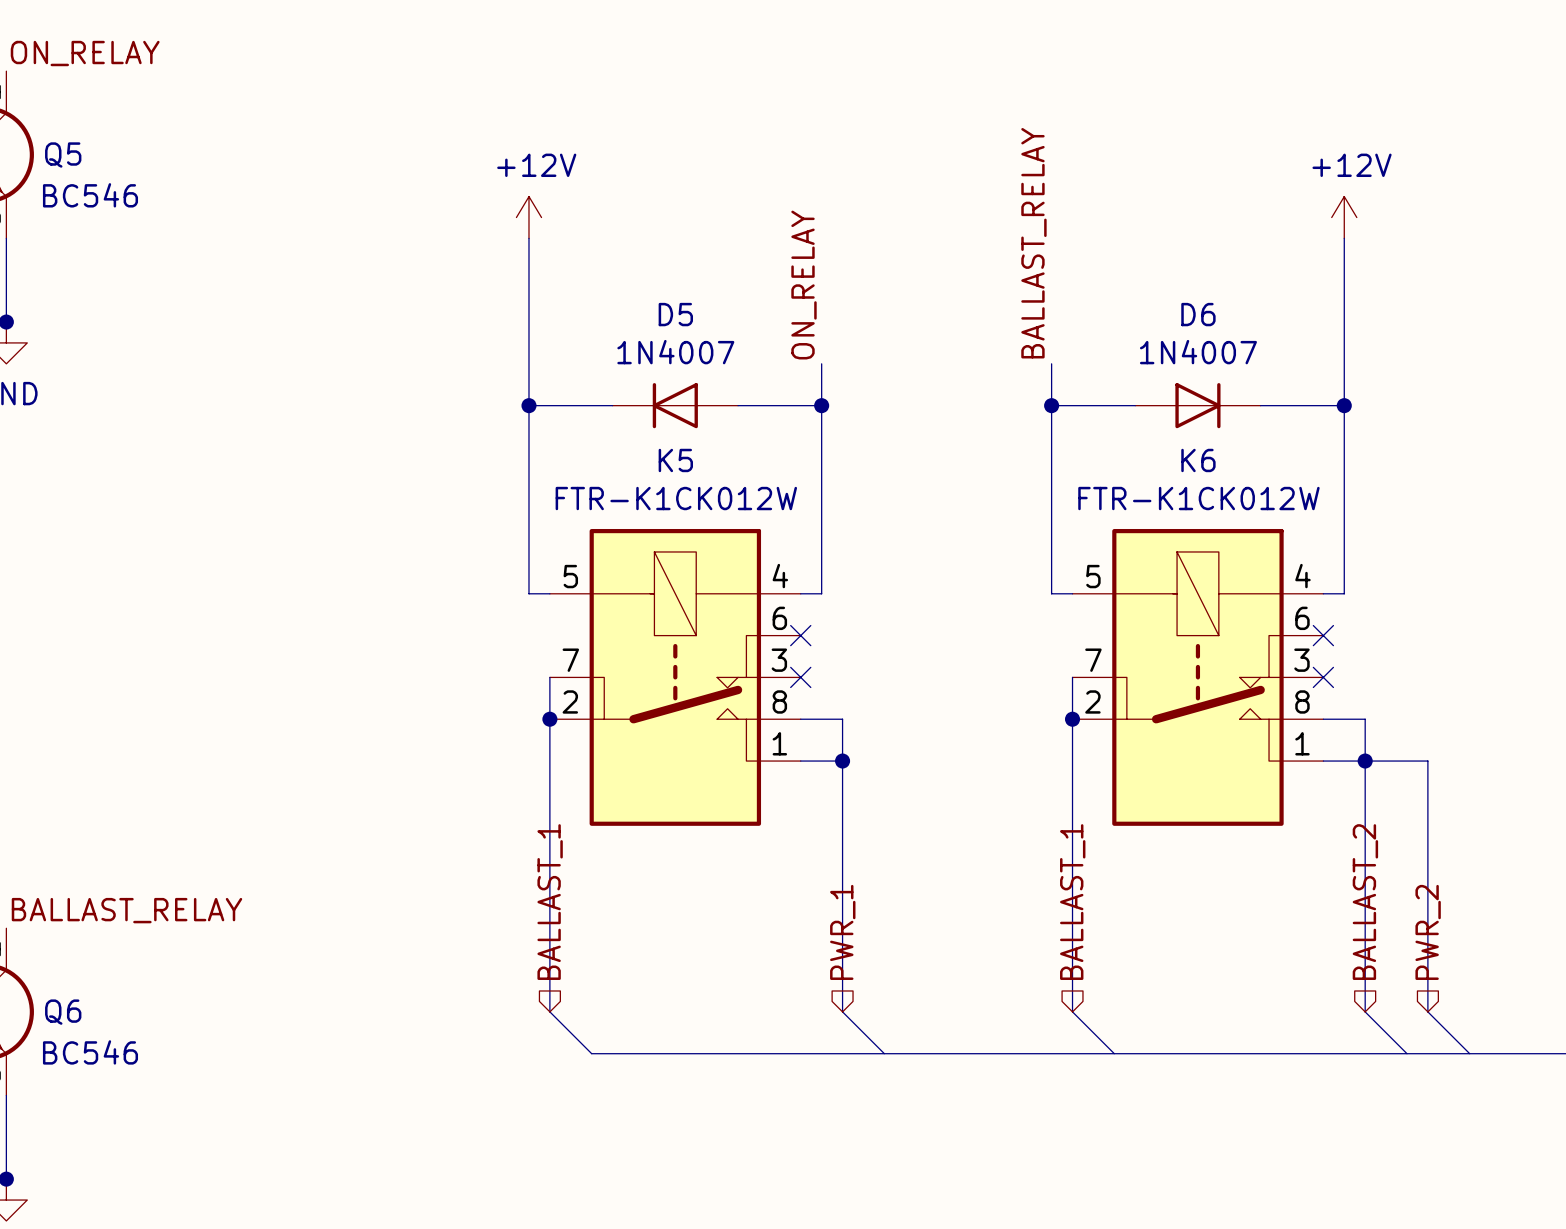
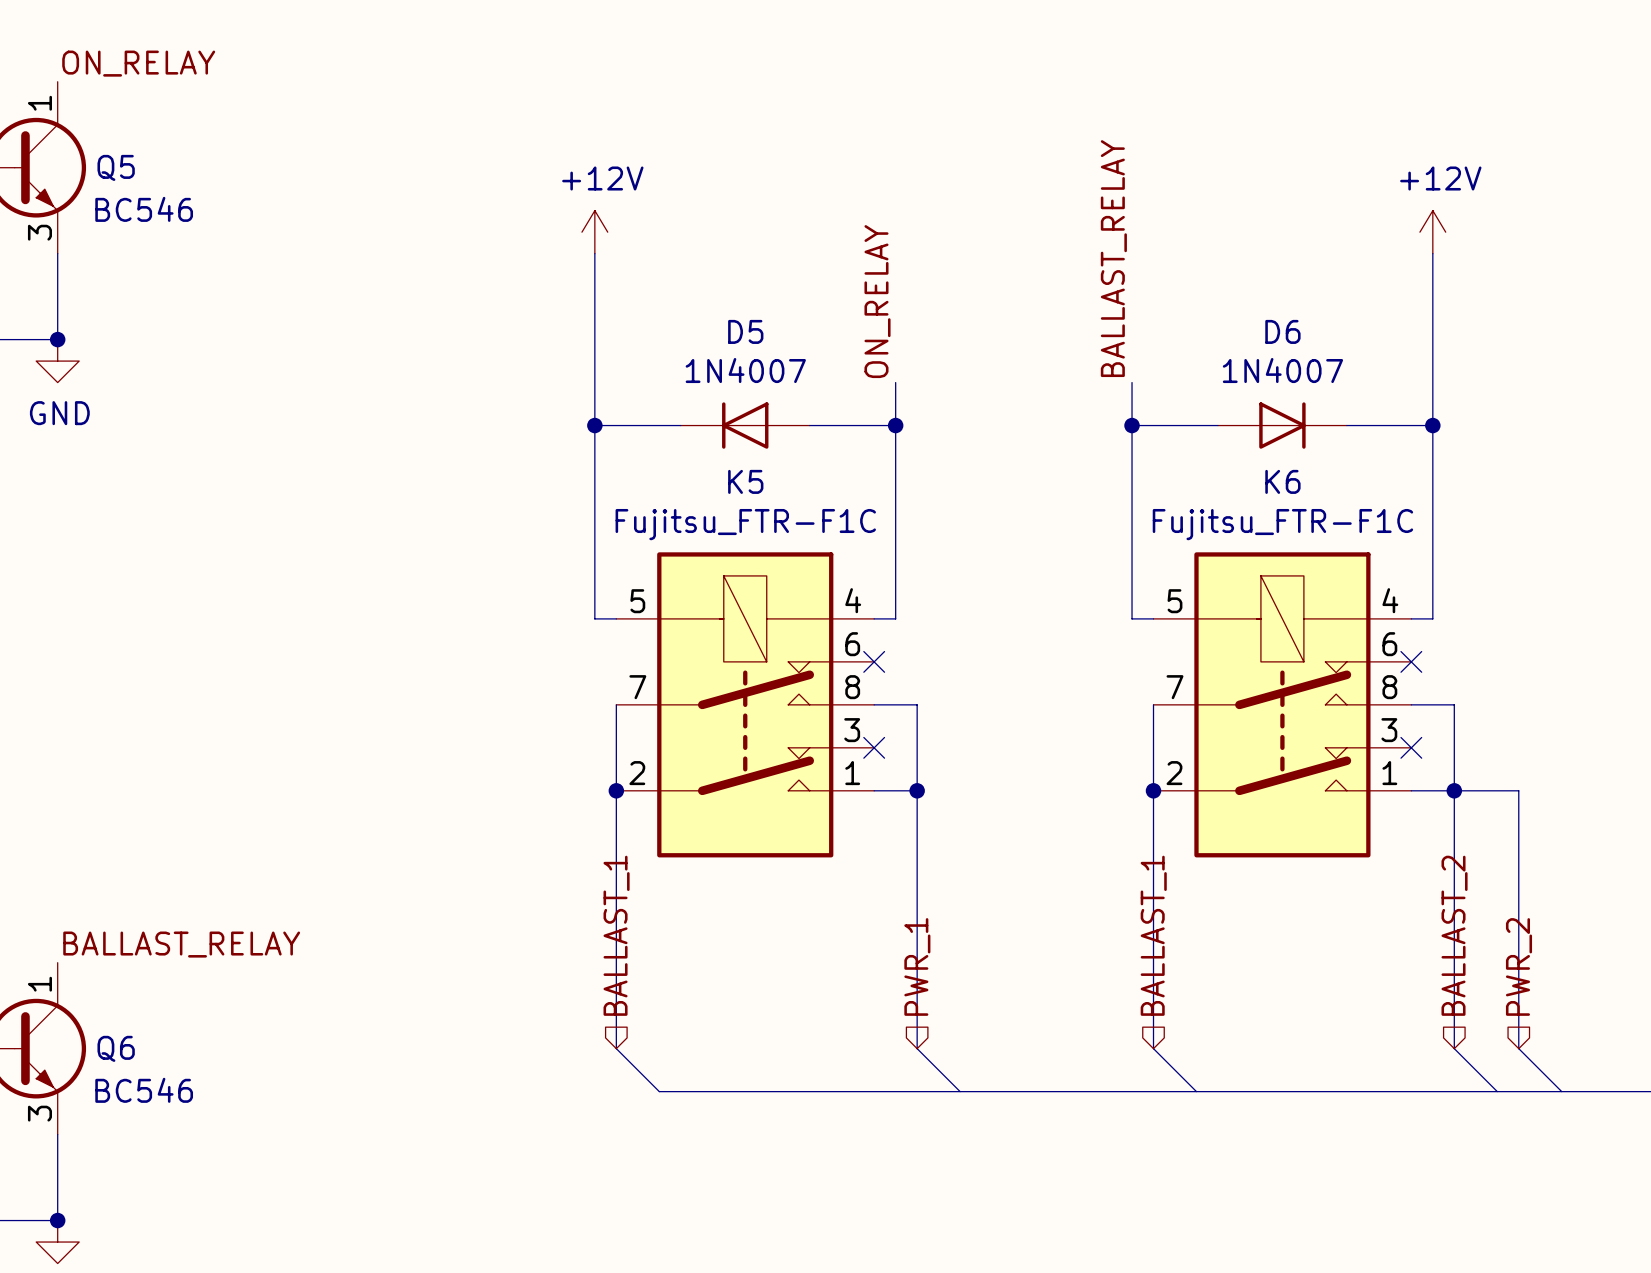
K5 value: FTR-K1CK012W (676, 498) -> Fujitsu_FTR-F1C (745, 524)
K6 value: FTR-K1CK012W (1198, 498) -> Fujitsu_FTR-F1C (1282, 524)
K5 symbol: [549, 528, 801, 826] -> [616, 552, 875, 858]
K6 symbol: [1072, 528, 1324, 826] -> [1153, 552, 1412, 858]
no-connect mark position: (800, 677) -> (874, 747)
no-connect mark position: (1323, 677) -> (1411, 747)
junction position: (549, 719) -> (616, 790)
wire: (800, 719) (842, 719) -> (874, 704) (917, 704) (917, 747)
junction position: (1072, 719) -> (1153, 790)
wire: (1323, 719) (1365, 719) -> (1411, 704) (1454, 704) (1454, 747)

